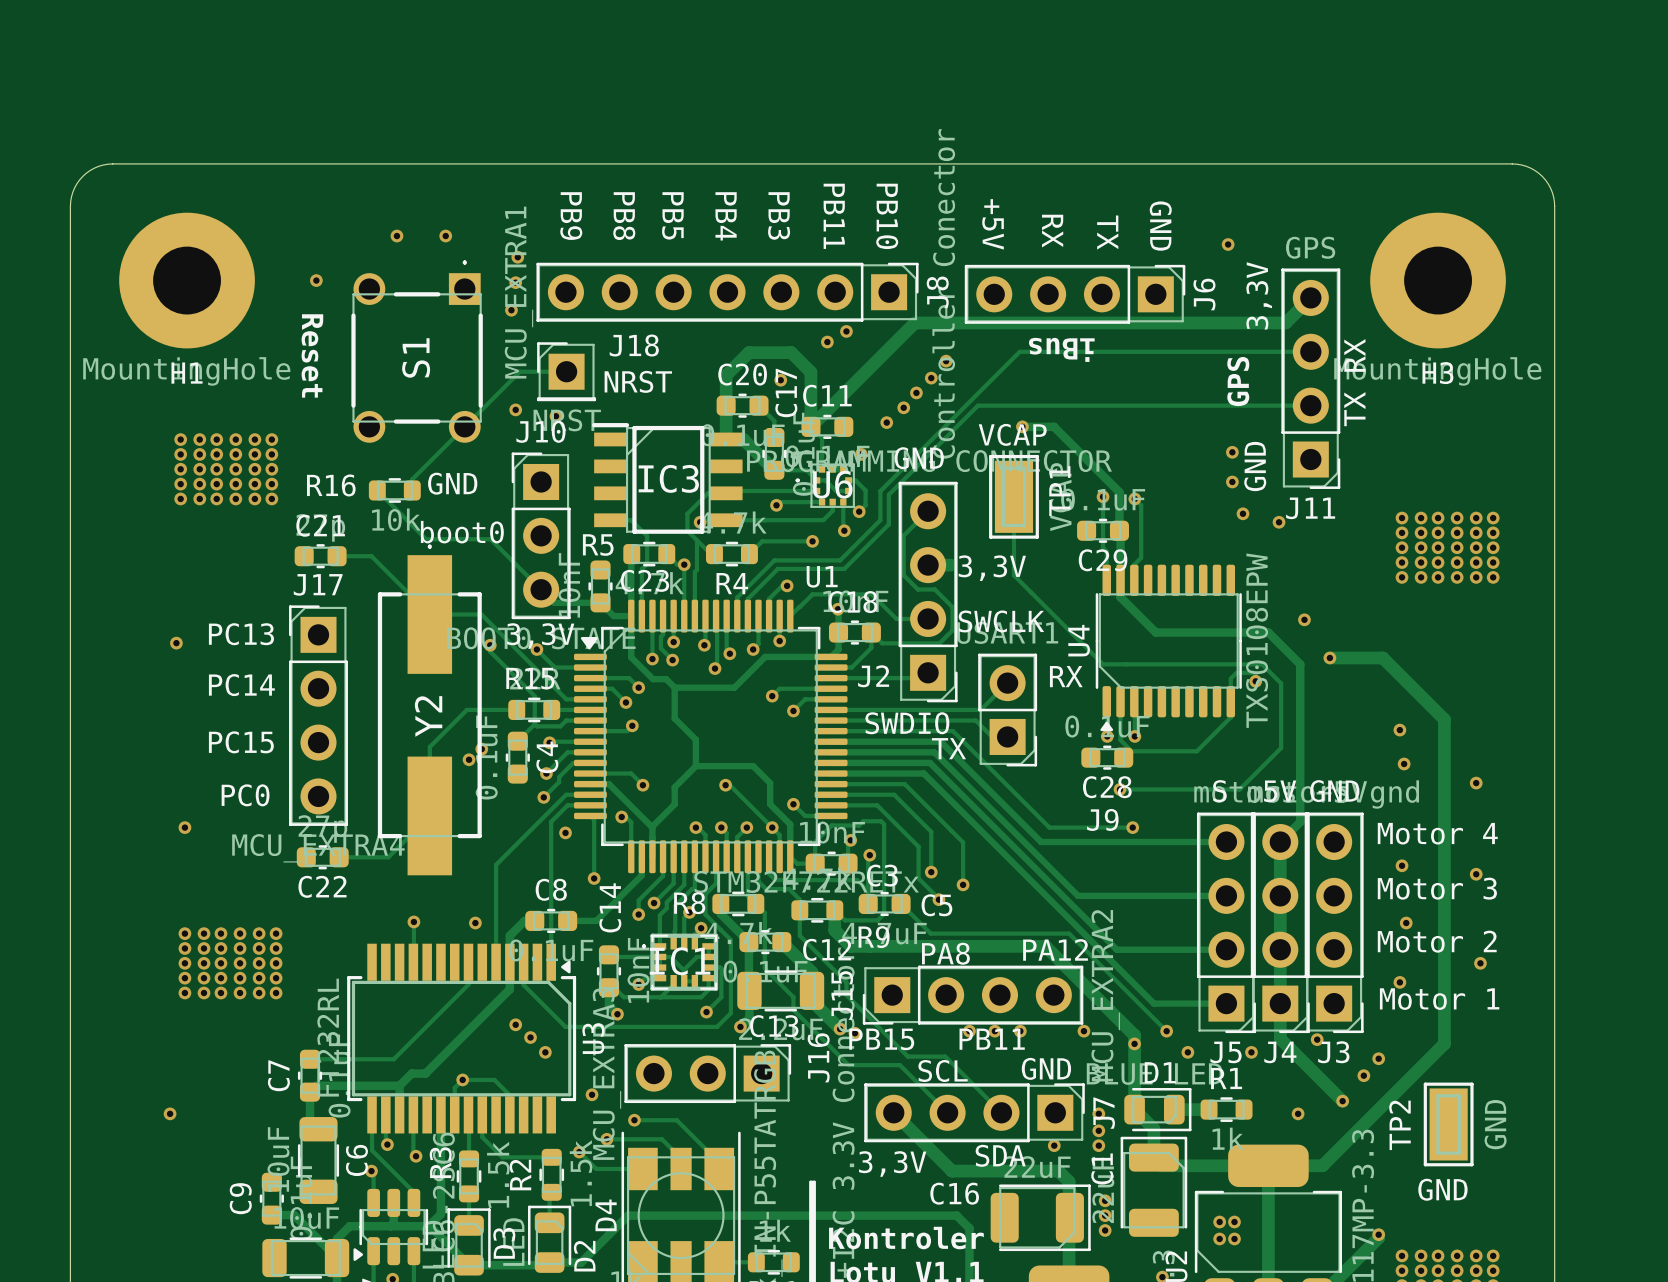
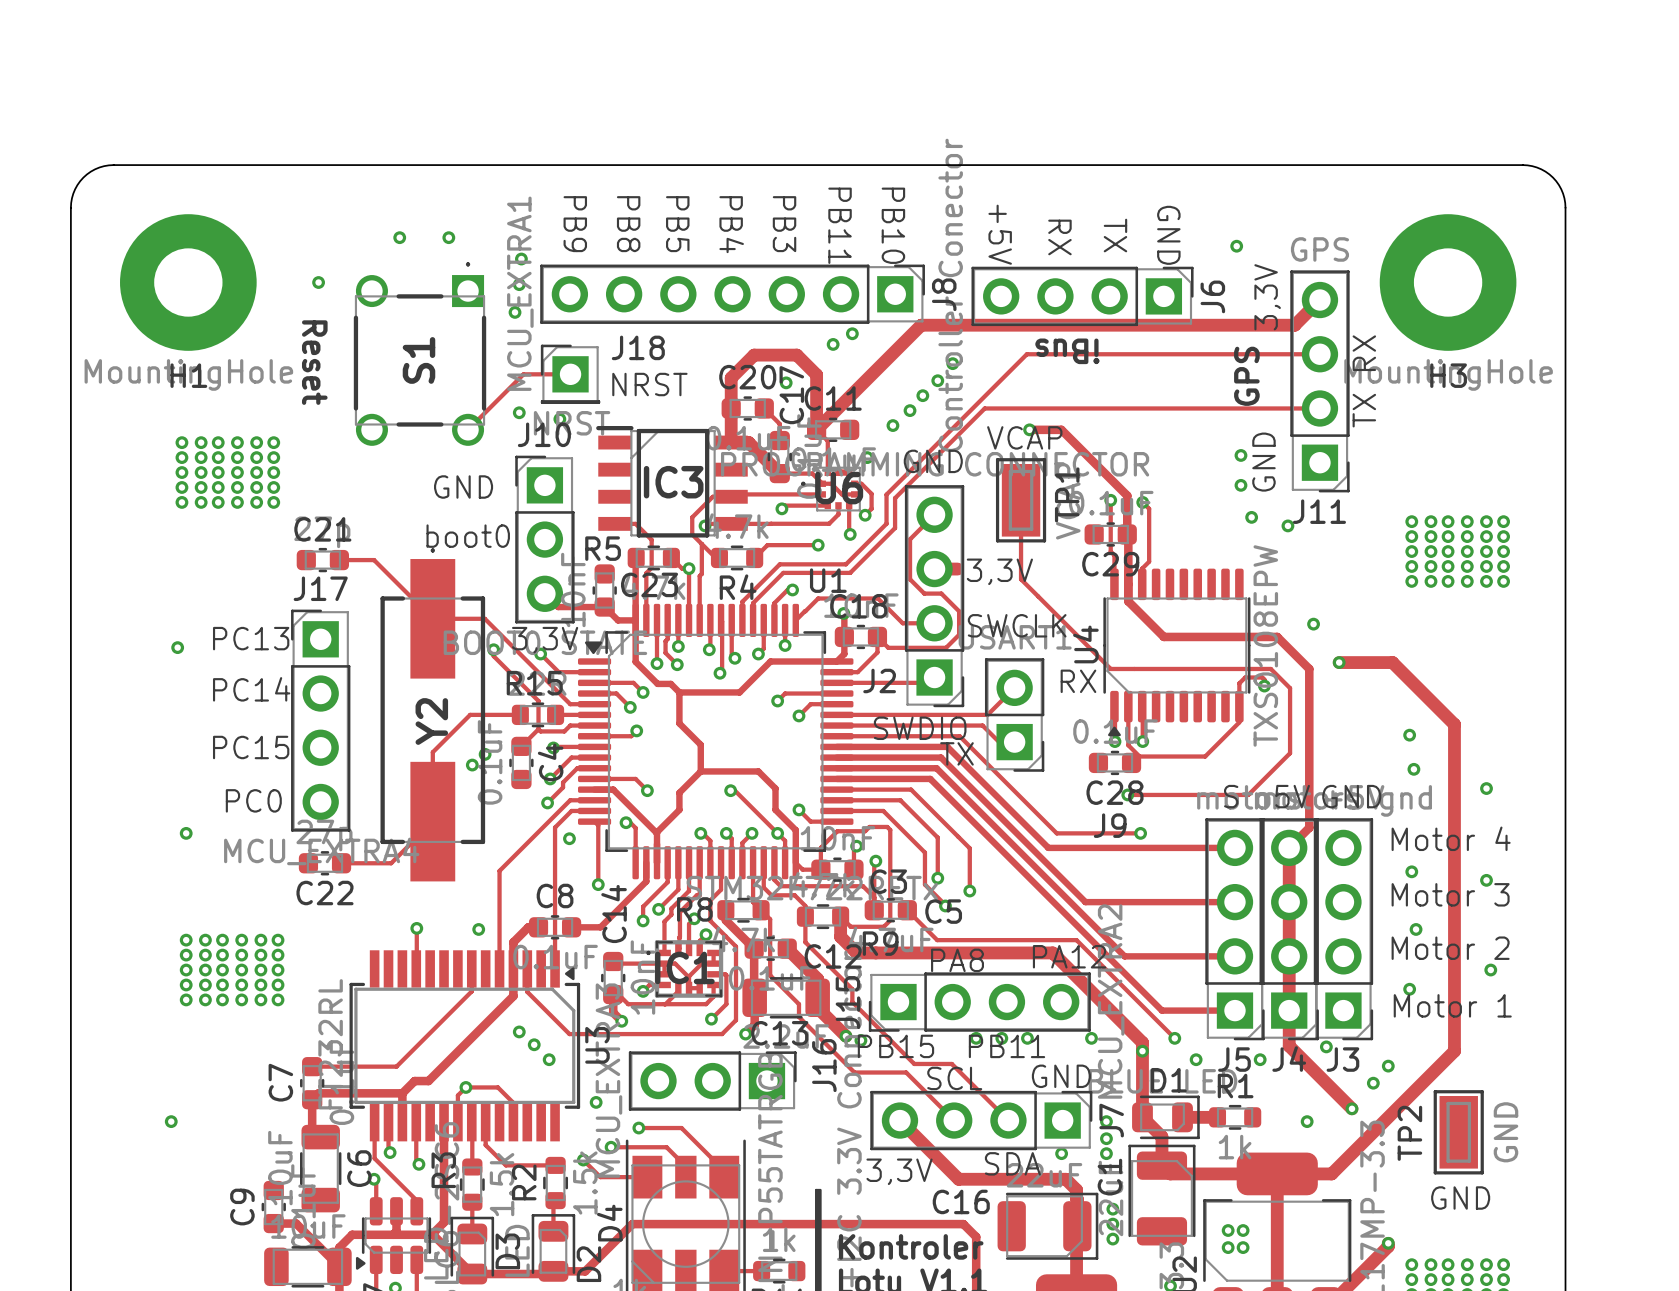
track: (464, 426) (412, 479) (412, 490) -> none
track: (377, 490) (426, 539) (490, 539) (541, 589) -> none
R16: 10k (394, 490) -> none

